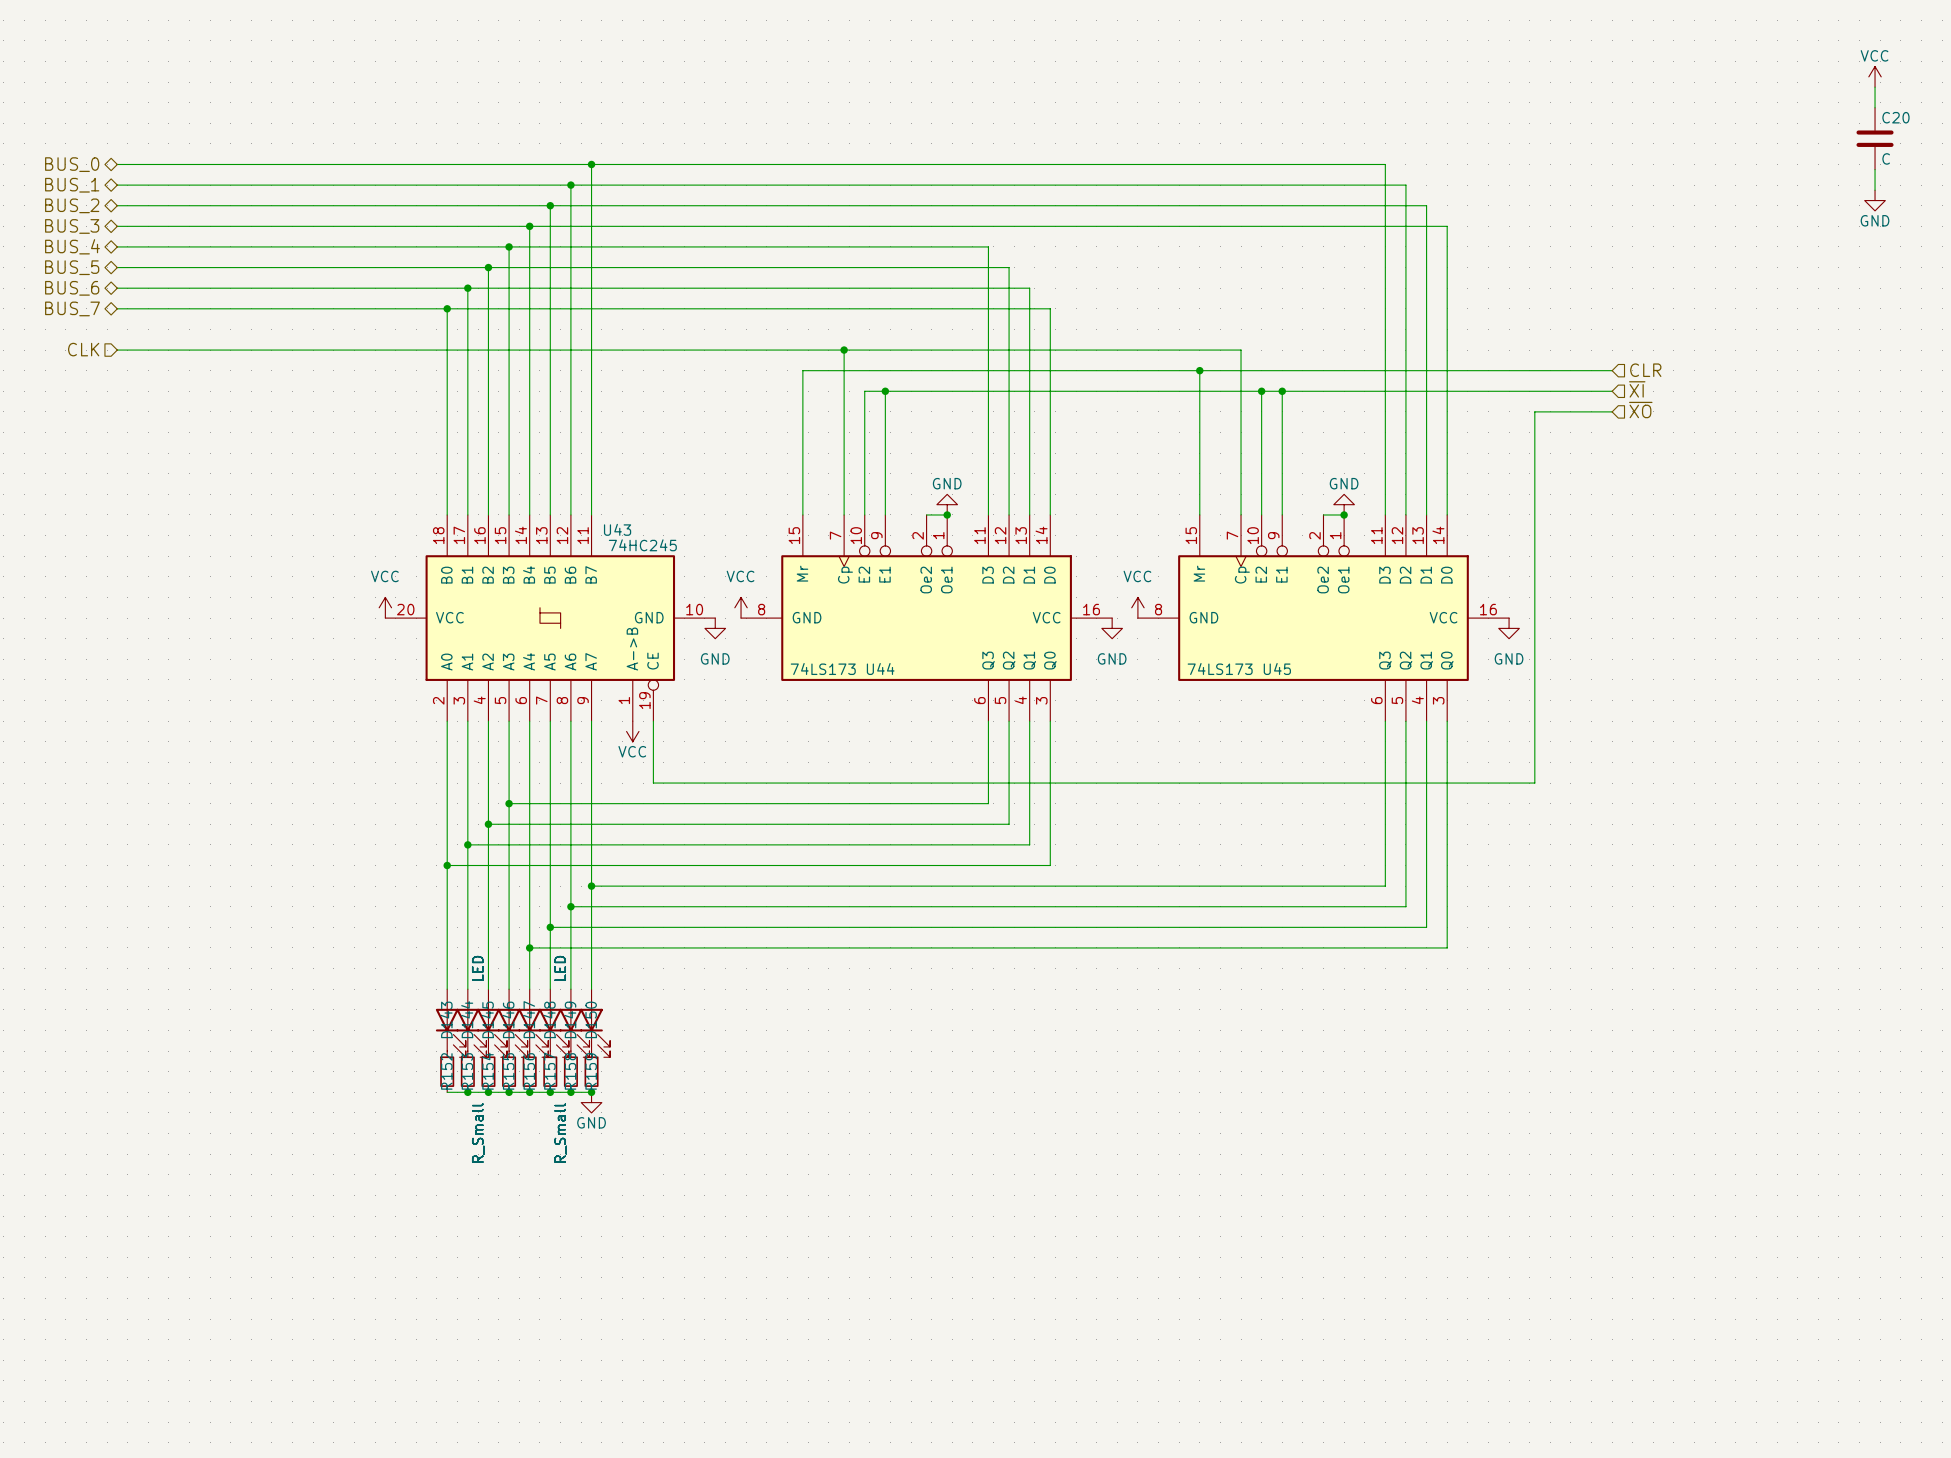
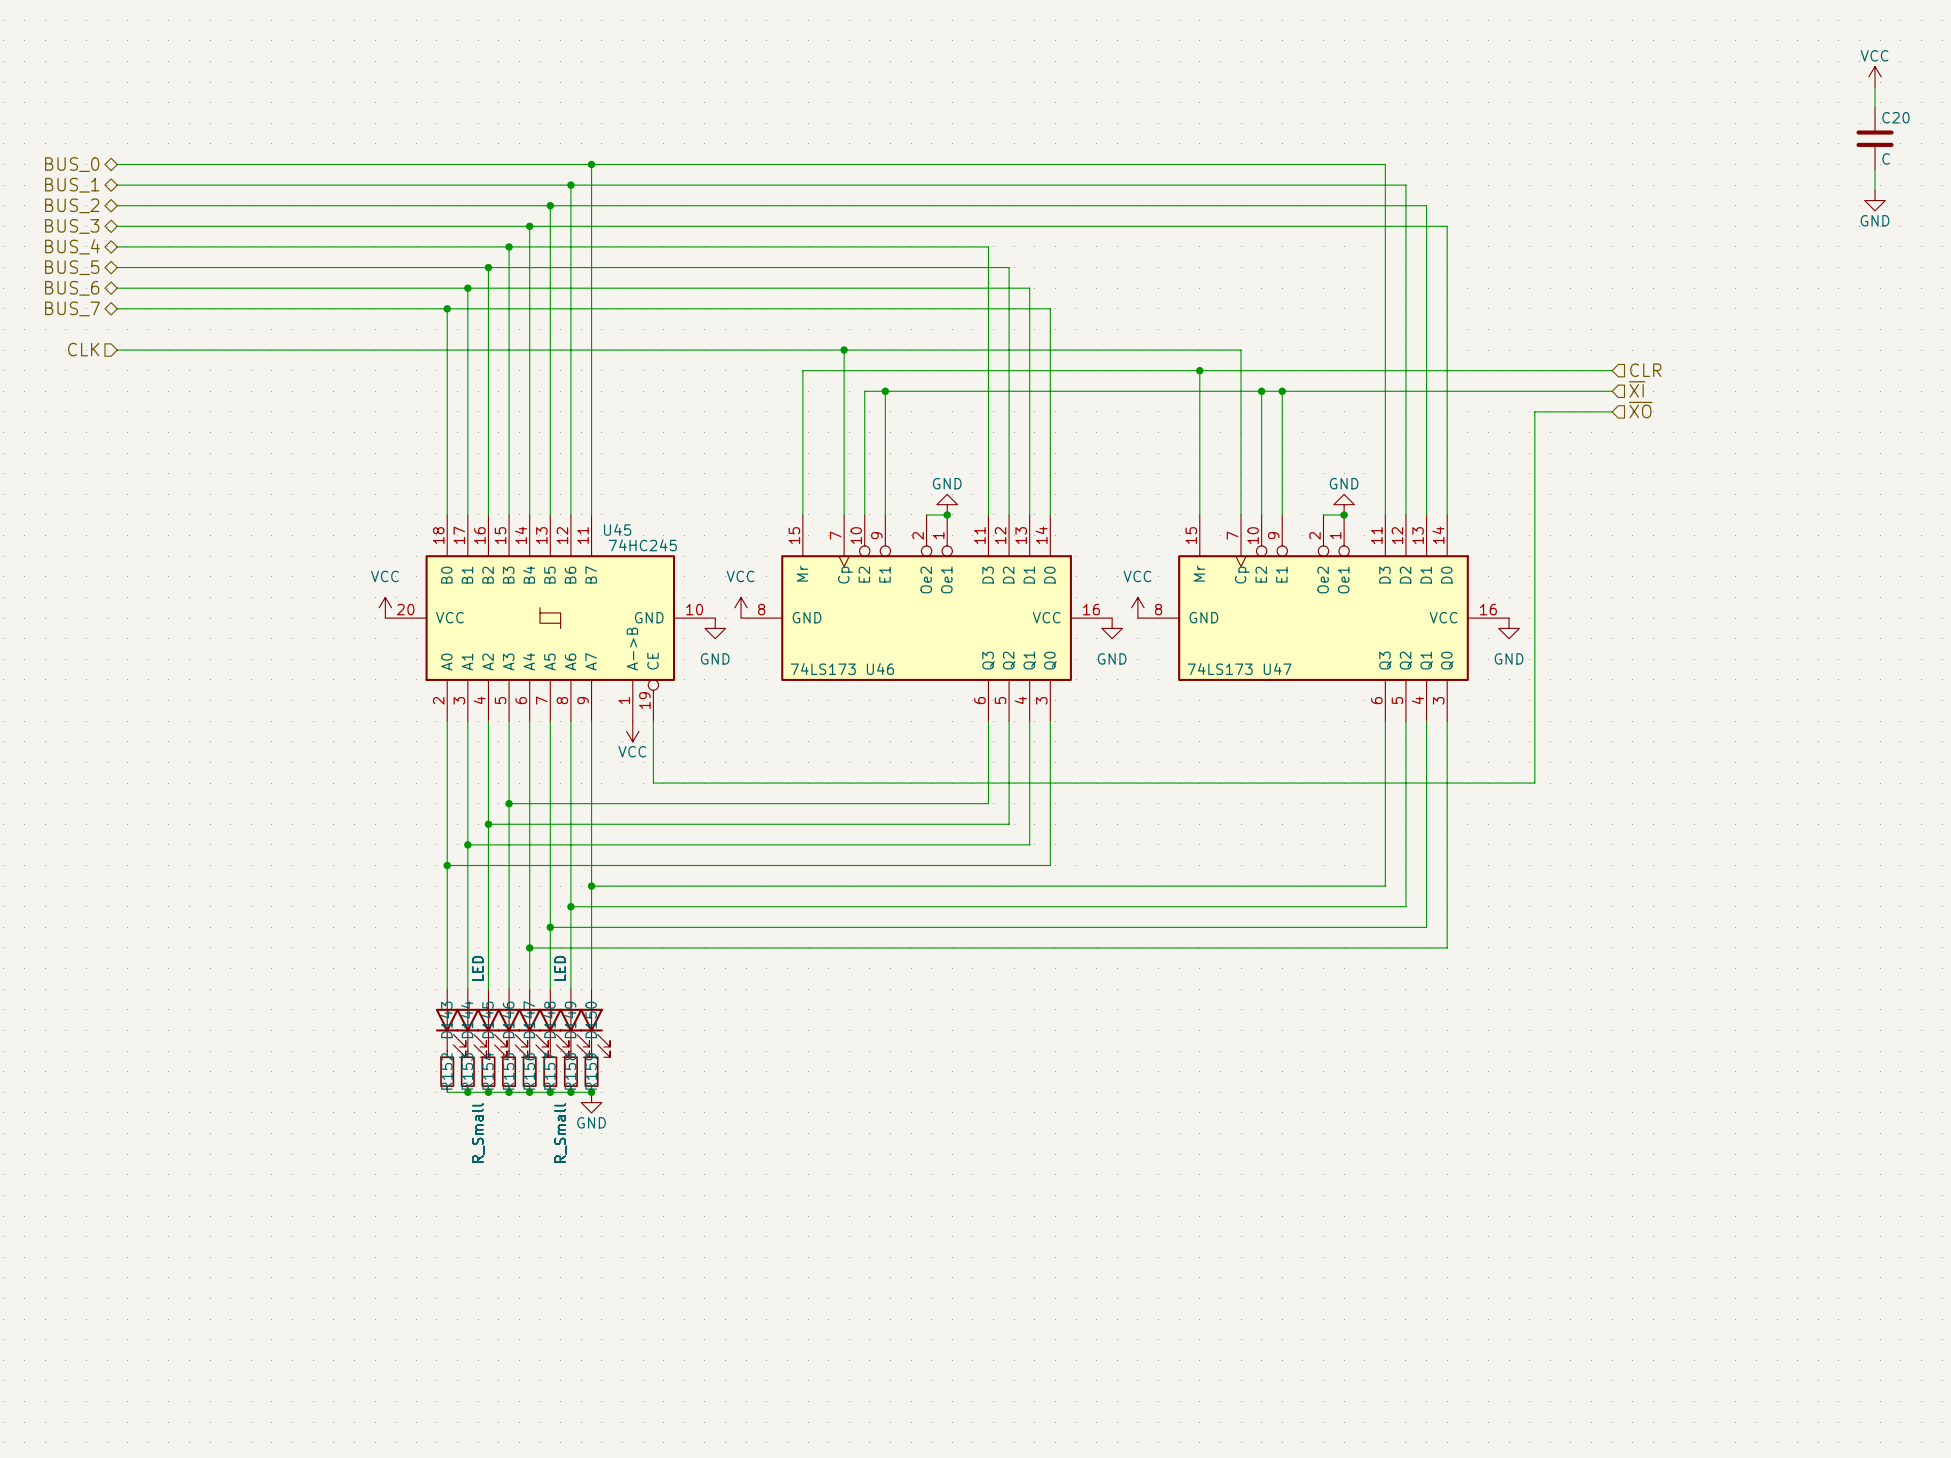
U43 name: U43 (617, 529) -> U45 (617, 529)
U44 name: U44 (880, 669) -> U46 (880, 669)
U45 name: U45 (1277, 669) -> U47 (1277, 669)

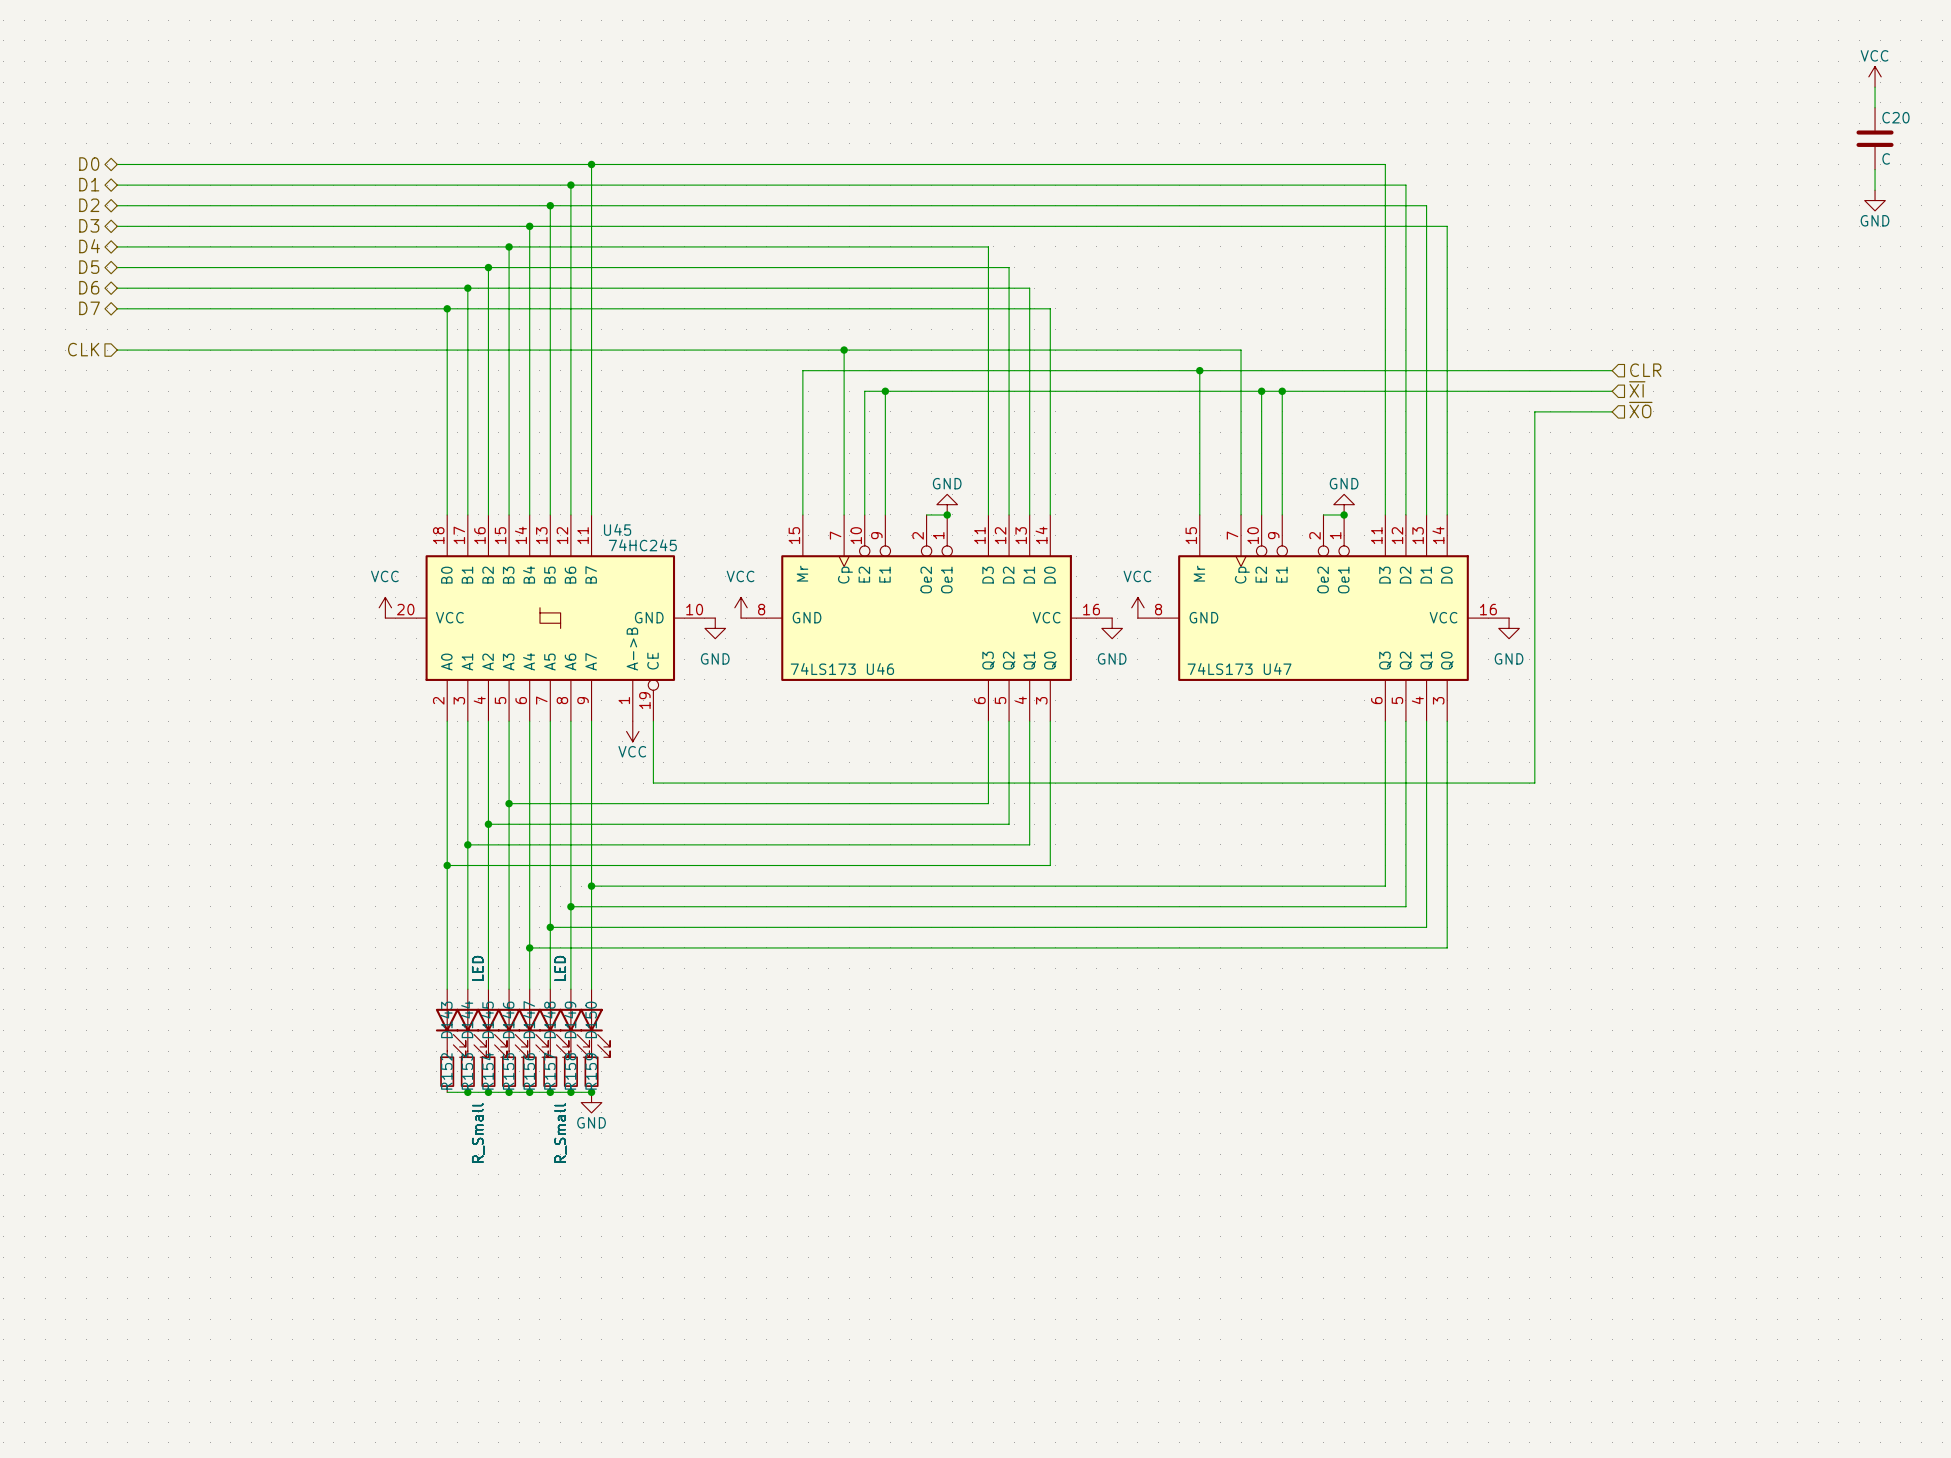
hierarchical label: BUS_0 (72, 164) -> D0 (89, 164)
hierarchical label: BUS_1 (72, 185) -> D1 (89, 184)
hierarchical label: BUS_2 (72, 205) -> D2 (89, 205)
hierarchical label: BUS_3 (72, 226) -> D3 (89, 225)
hierarchical label: BUS_4 (72, 246) -> D4 (89, 246)
hierarchical label: BUS_5 (72, 267) -> D5 (89, 267)
hierarchical label: BUS_6 (72, 288) -> D6 (89, 287)
hierarchical label: BUS_7 (72, 308) -> D7 (89, 308)

